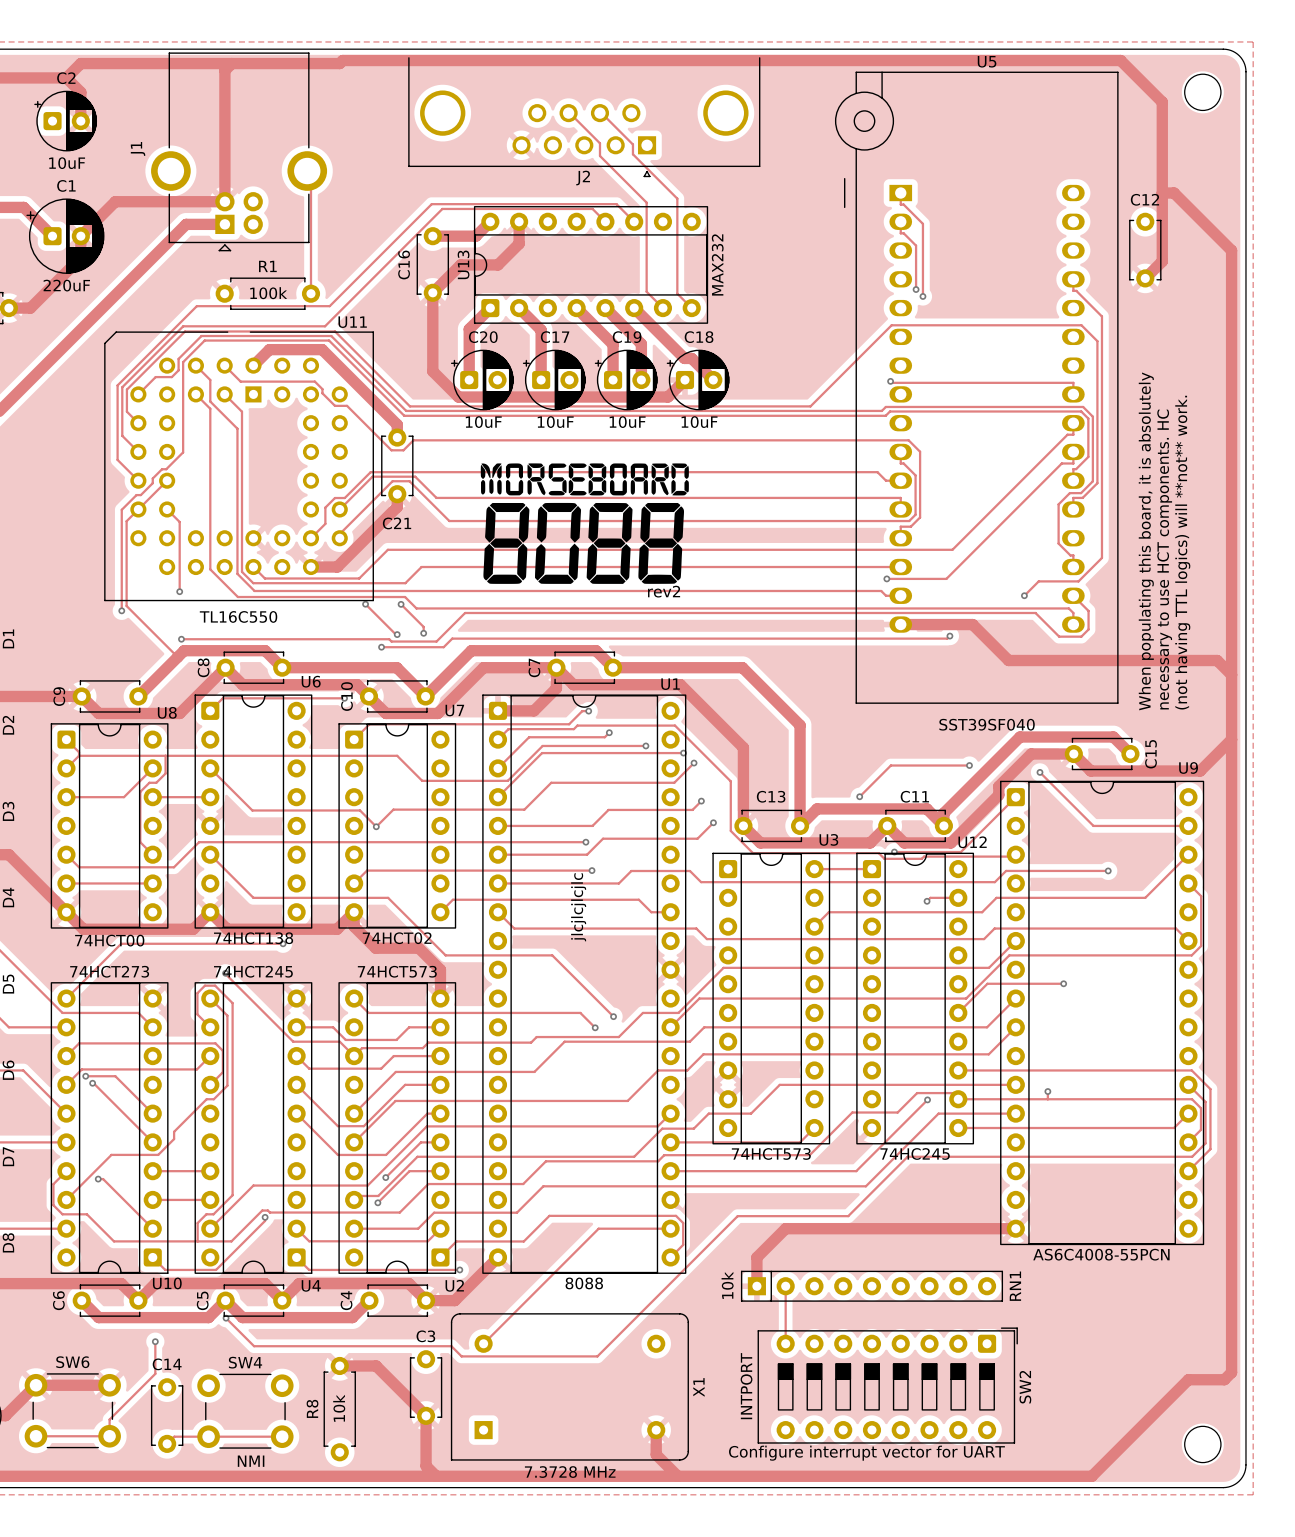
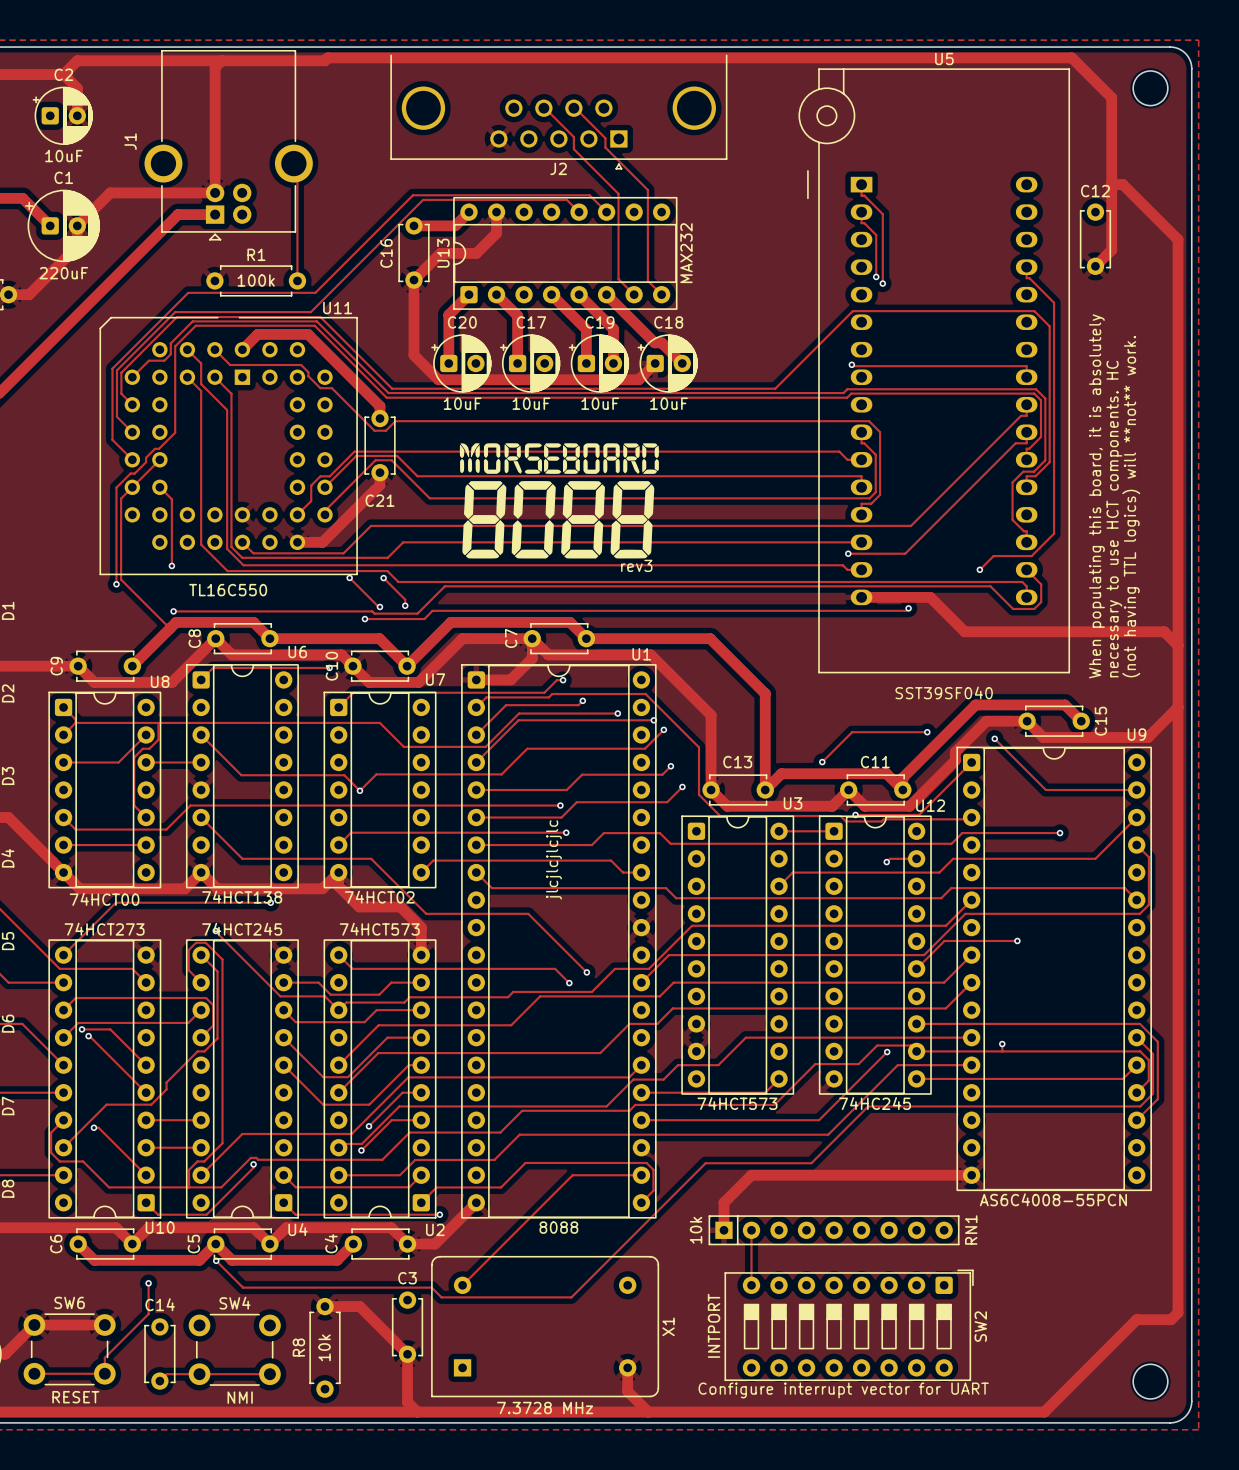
text: rev2 (664, 591) -> rev3 (636, 565)
SW6 value: none -> RESET (75, 1397)

